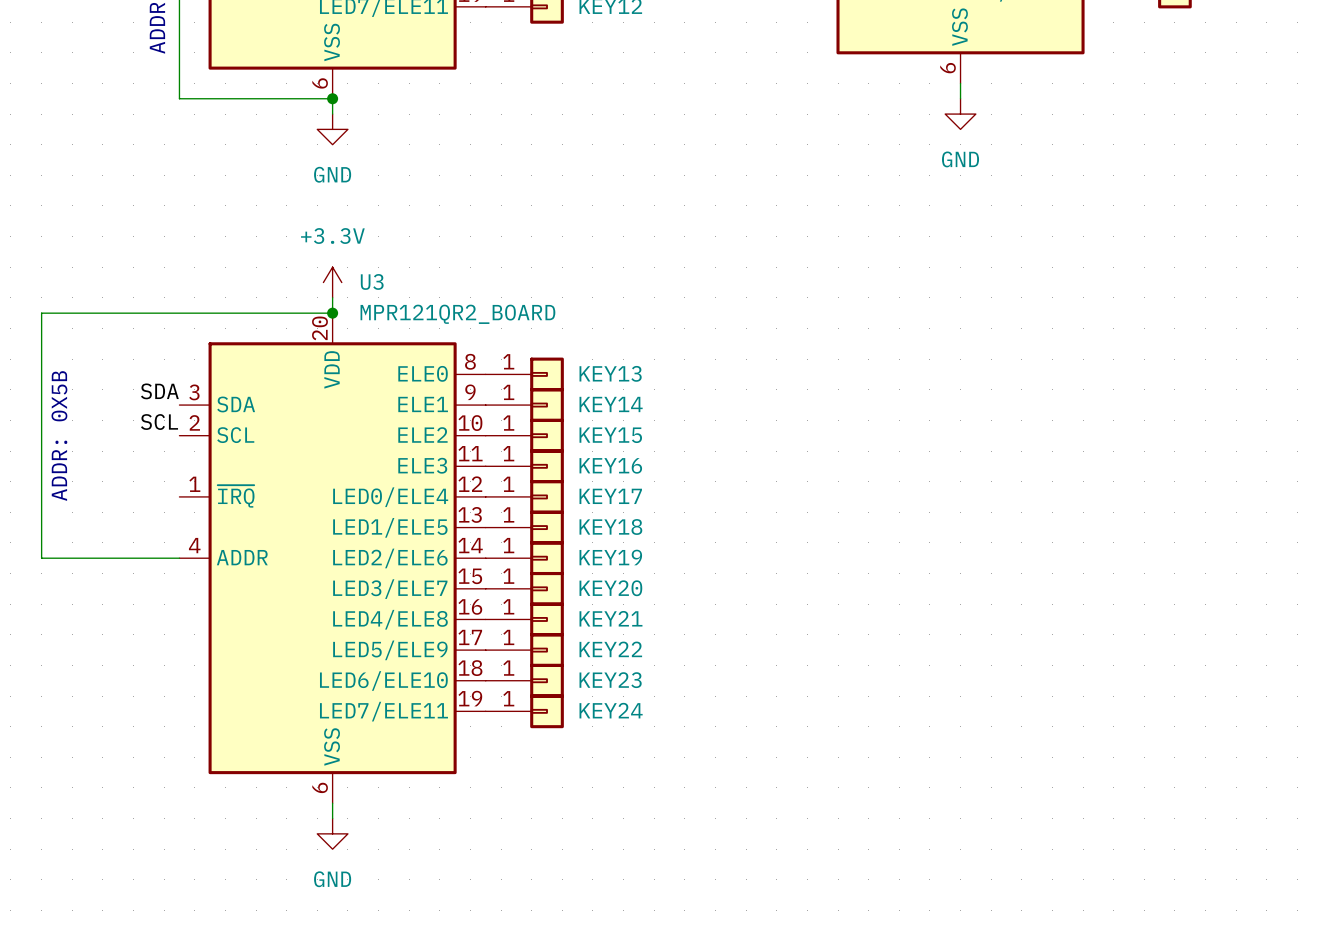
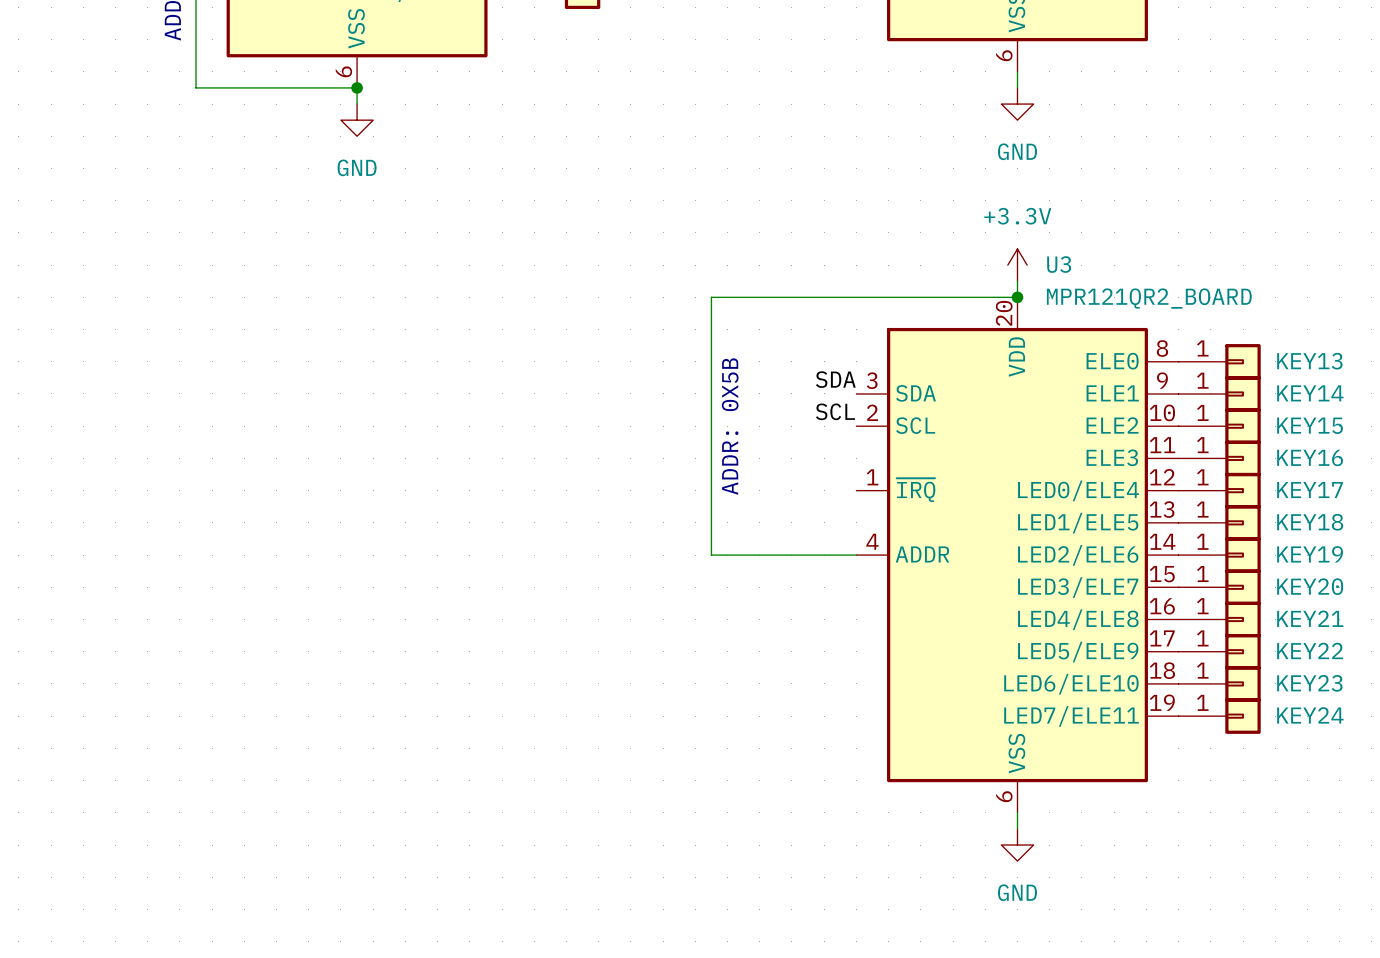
power symbol: none -> +3.3V (1017, 265)
power symbol: +3.3V (332, 282) -> none
wire: none -> (1017, 281) (1017, 297) (711, 297) (711, 555) (856, 555)
wire: (332, 297) (332, 313) (41, 313) (41, 558) (179, 558) -> none
junction: none -> (1017, 297)
junction: (332, 313) -> none
KEY13 position: (524, 374) -> (1219, 361)
label: none -> SDA (835, 379)
label: SDA (159, 391) -> none
KEY14 position: (524, 405) -> (1219, 393)
label: none -> SCL (835, 411)
text: none -> ADDR: 0X5B (730, 426)
label: SCL (159, 422) -> none
KEY15 position: (524, 435) -> (1219, 426)
text: ADDR: 0X5B (59, 436) -> none
KEY16 position: (524, 466) -> (1219, 458)
KEY17 position: (524, 496) -> (1219, 490)
KEY18 position: (524, 527) -> (1219, 522)
U3 position: (332, 558) -> (1017, 555)
KEY19 position: (524, 558) -> (1219, 555)
KEY20 position: (524, 588) -> (1219, 587)
KEY21 position: (524, 619) -> (1219, 619)
KEY22 position: (524, 650) -> (1219, 651)
KEY23 position: (524, 680) -> (1219, 683)
KEY24 position: (524, 711) -> (1219, 716)
wire: none -> (1017, 812) (1017, 828)
wire: (332, 803) (332, 818) -> none
power symbol: none -> GND (1017, 845)
power symbol: GND (332, 833) -> none

